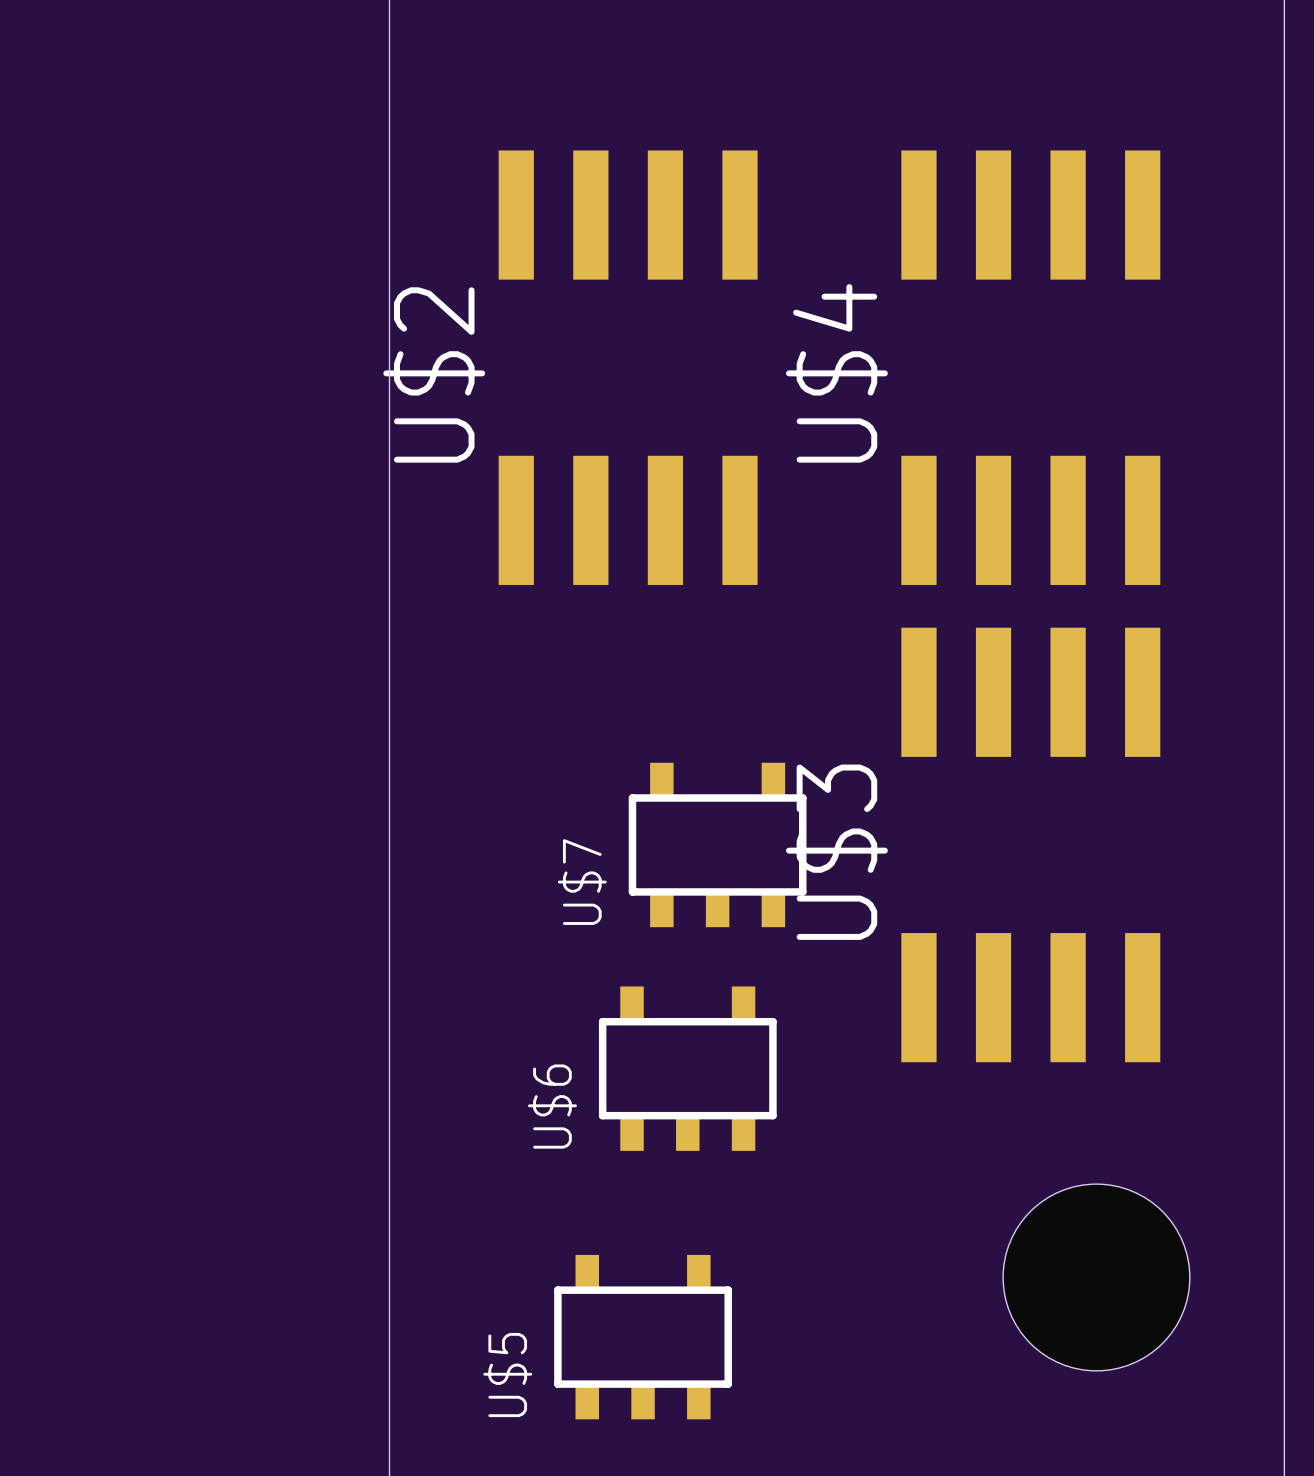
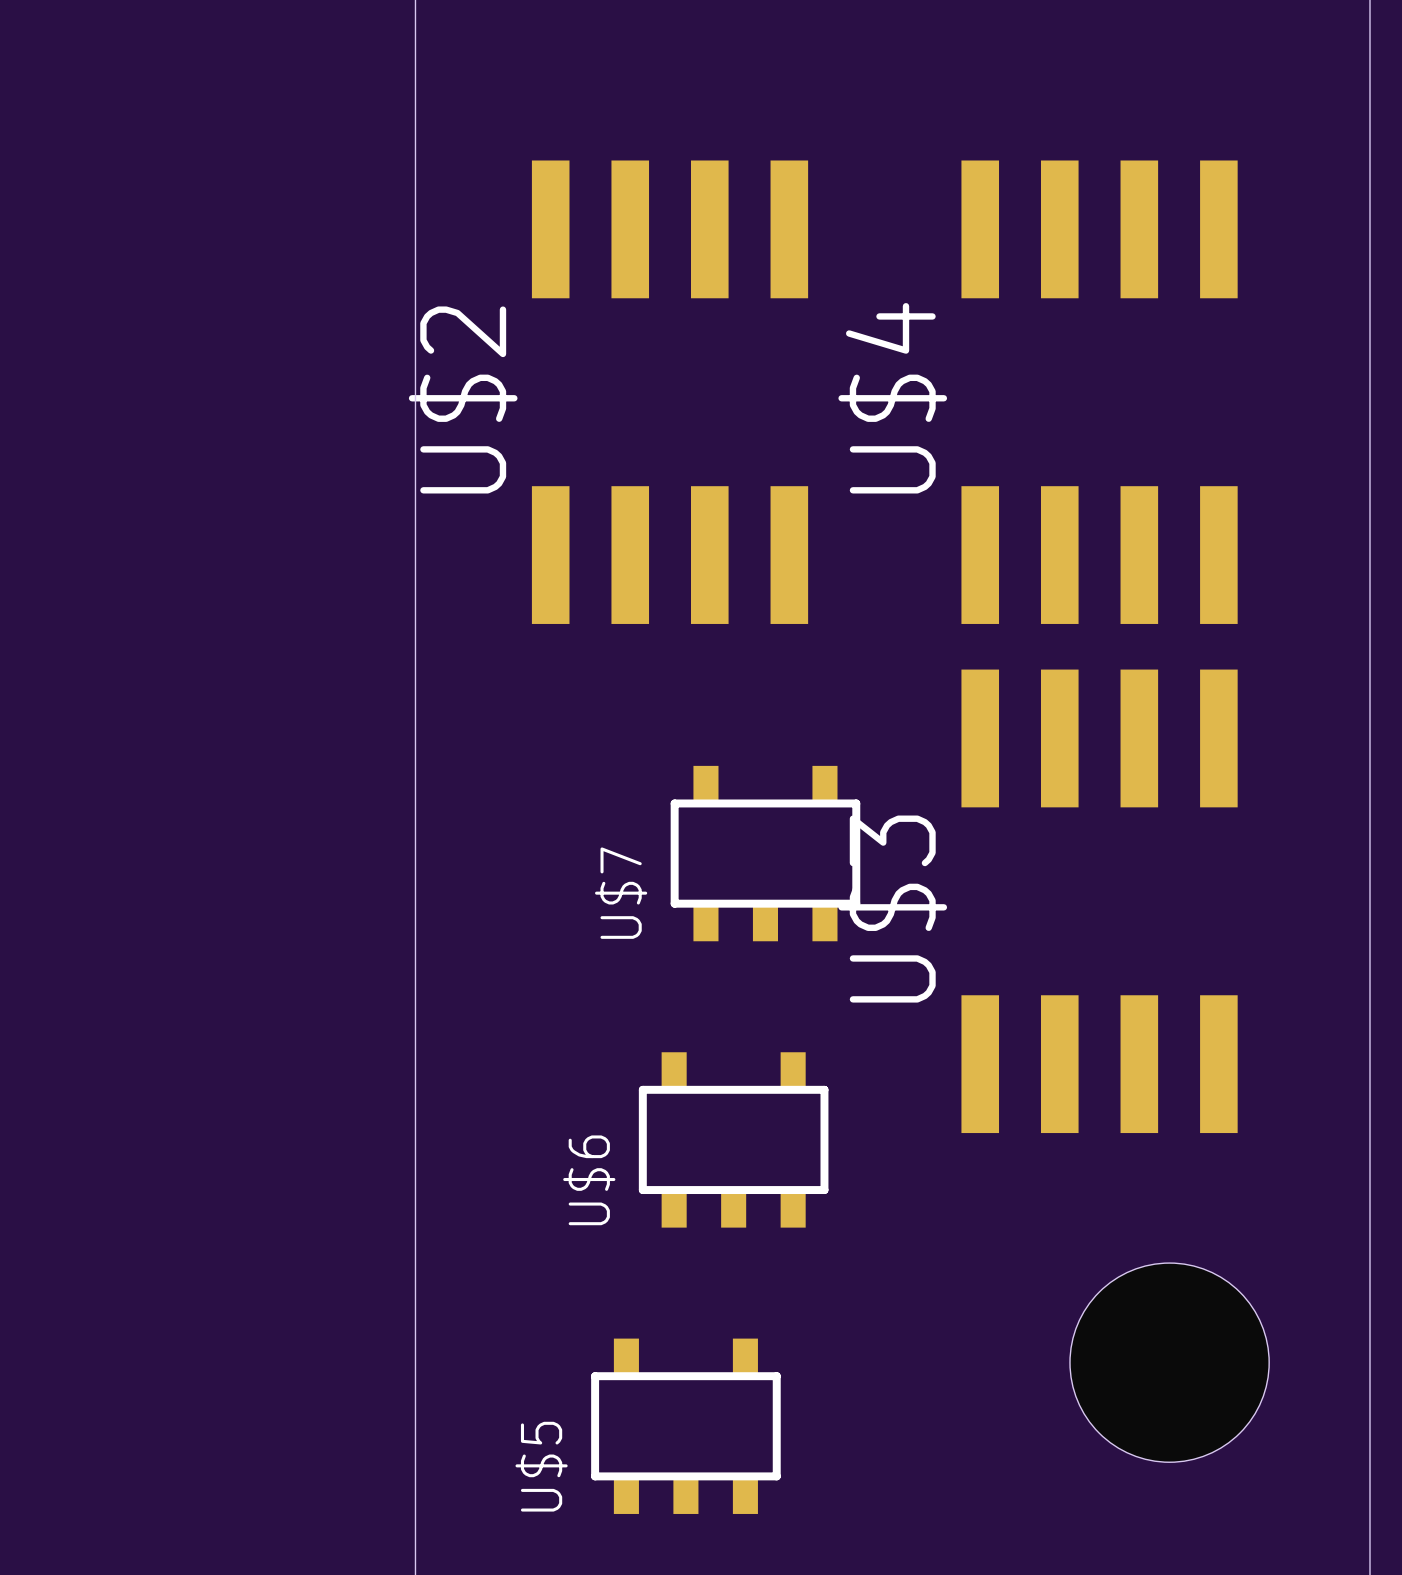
U$7 position: (717, 844) -> (765, 853)

